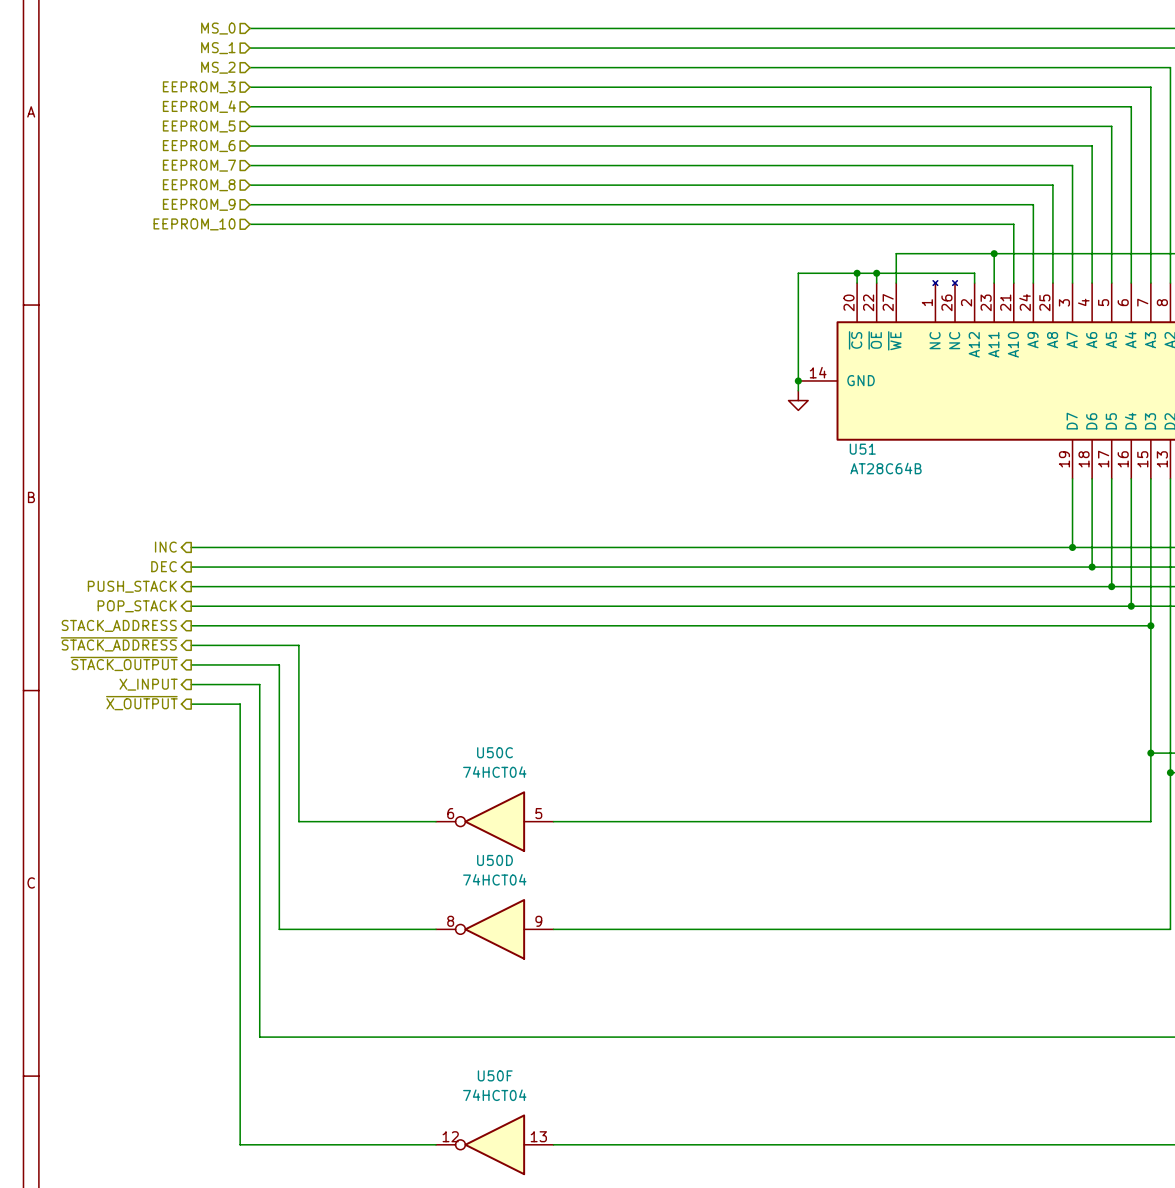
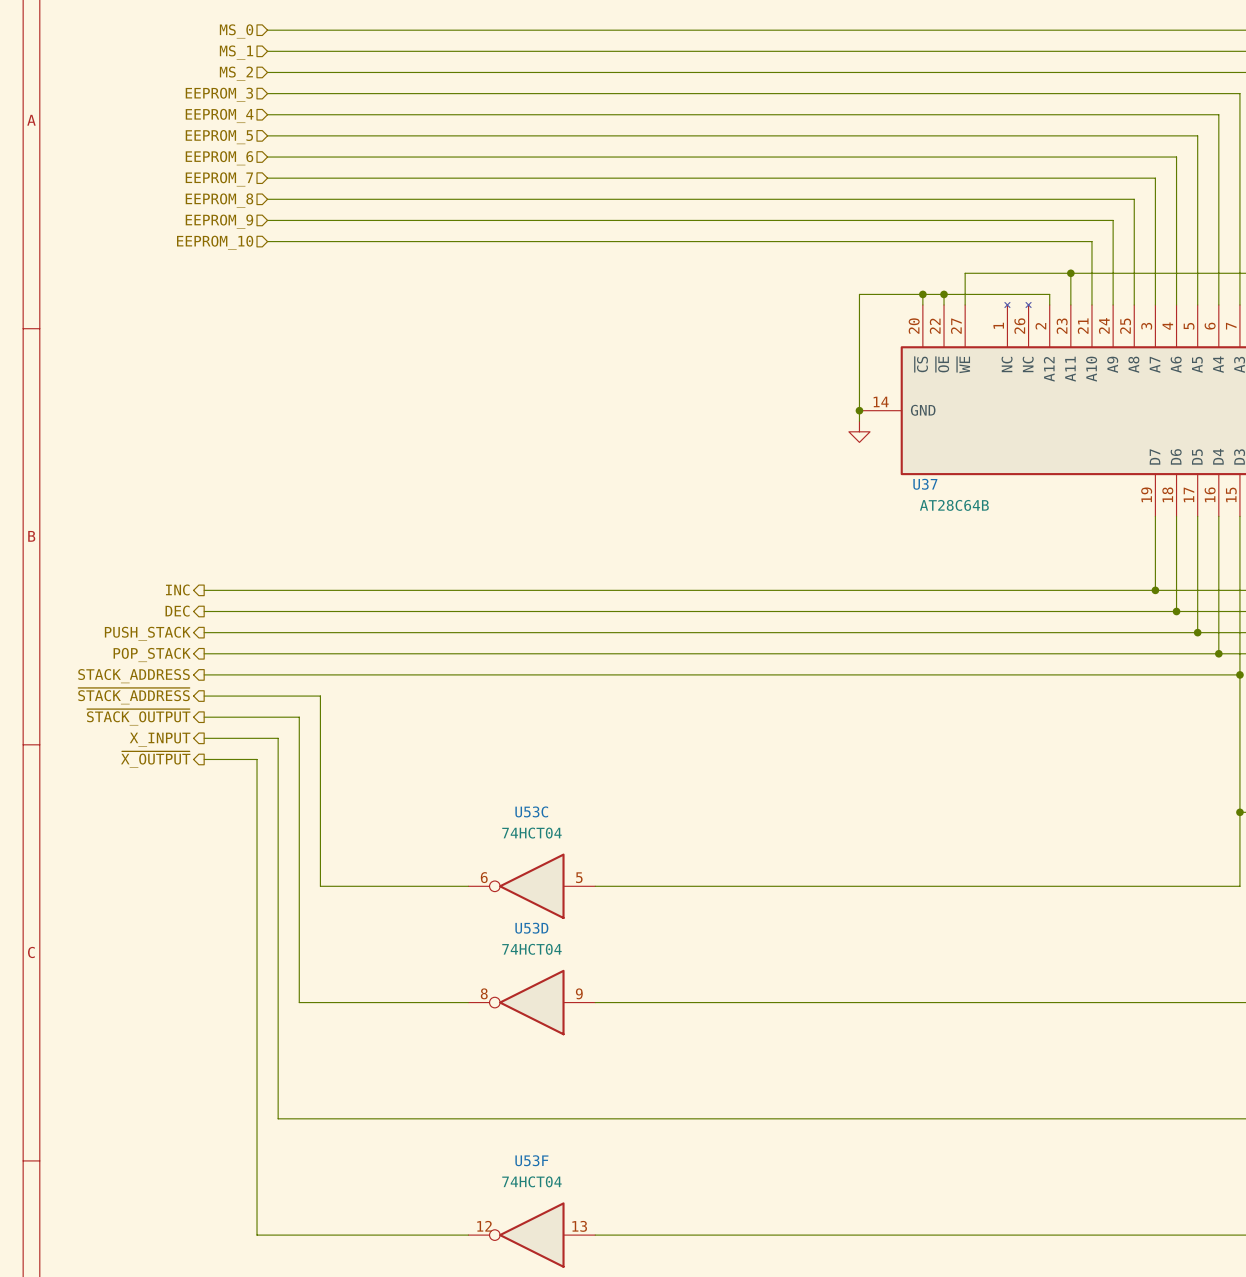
U51 name: U51 (862, 449) -> U37 (925, 484)
U50C name: U50C (495, 752) -> U53C (531, 811)
U50D name: U50D (495, 860) -> U53D (531, 928)
U50F name: U50F (495, 1075) -> U53F (531, 1160)

